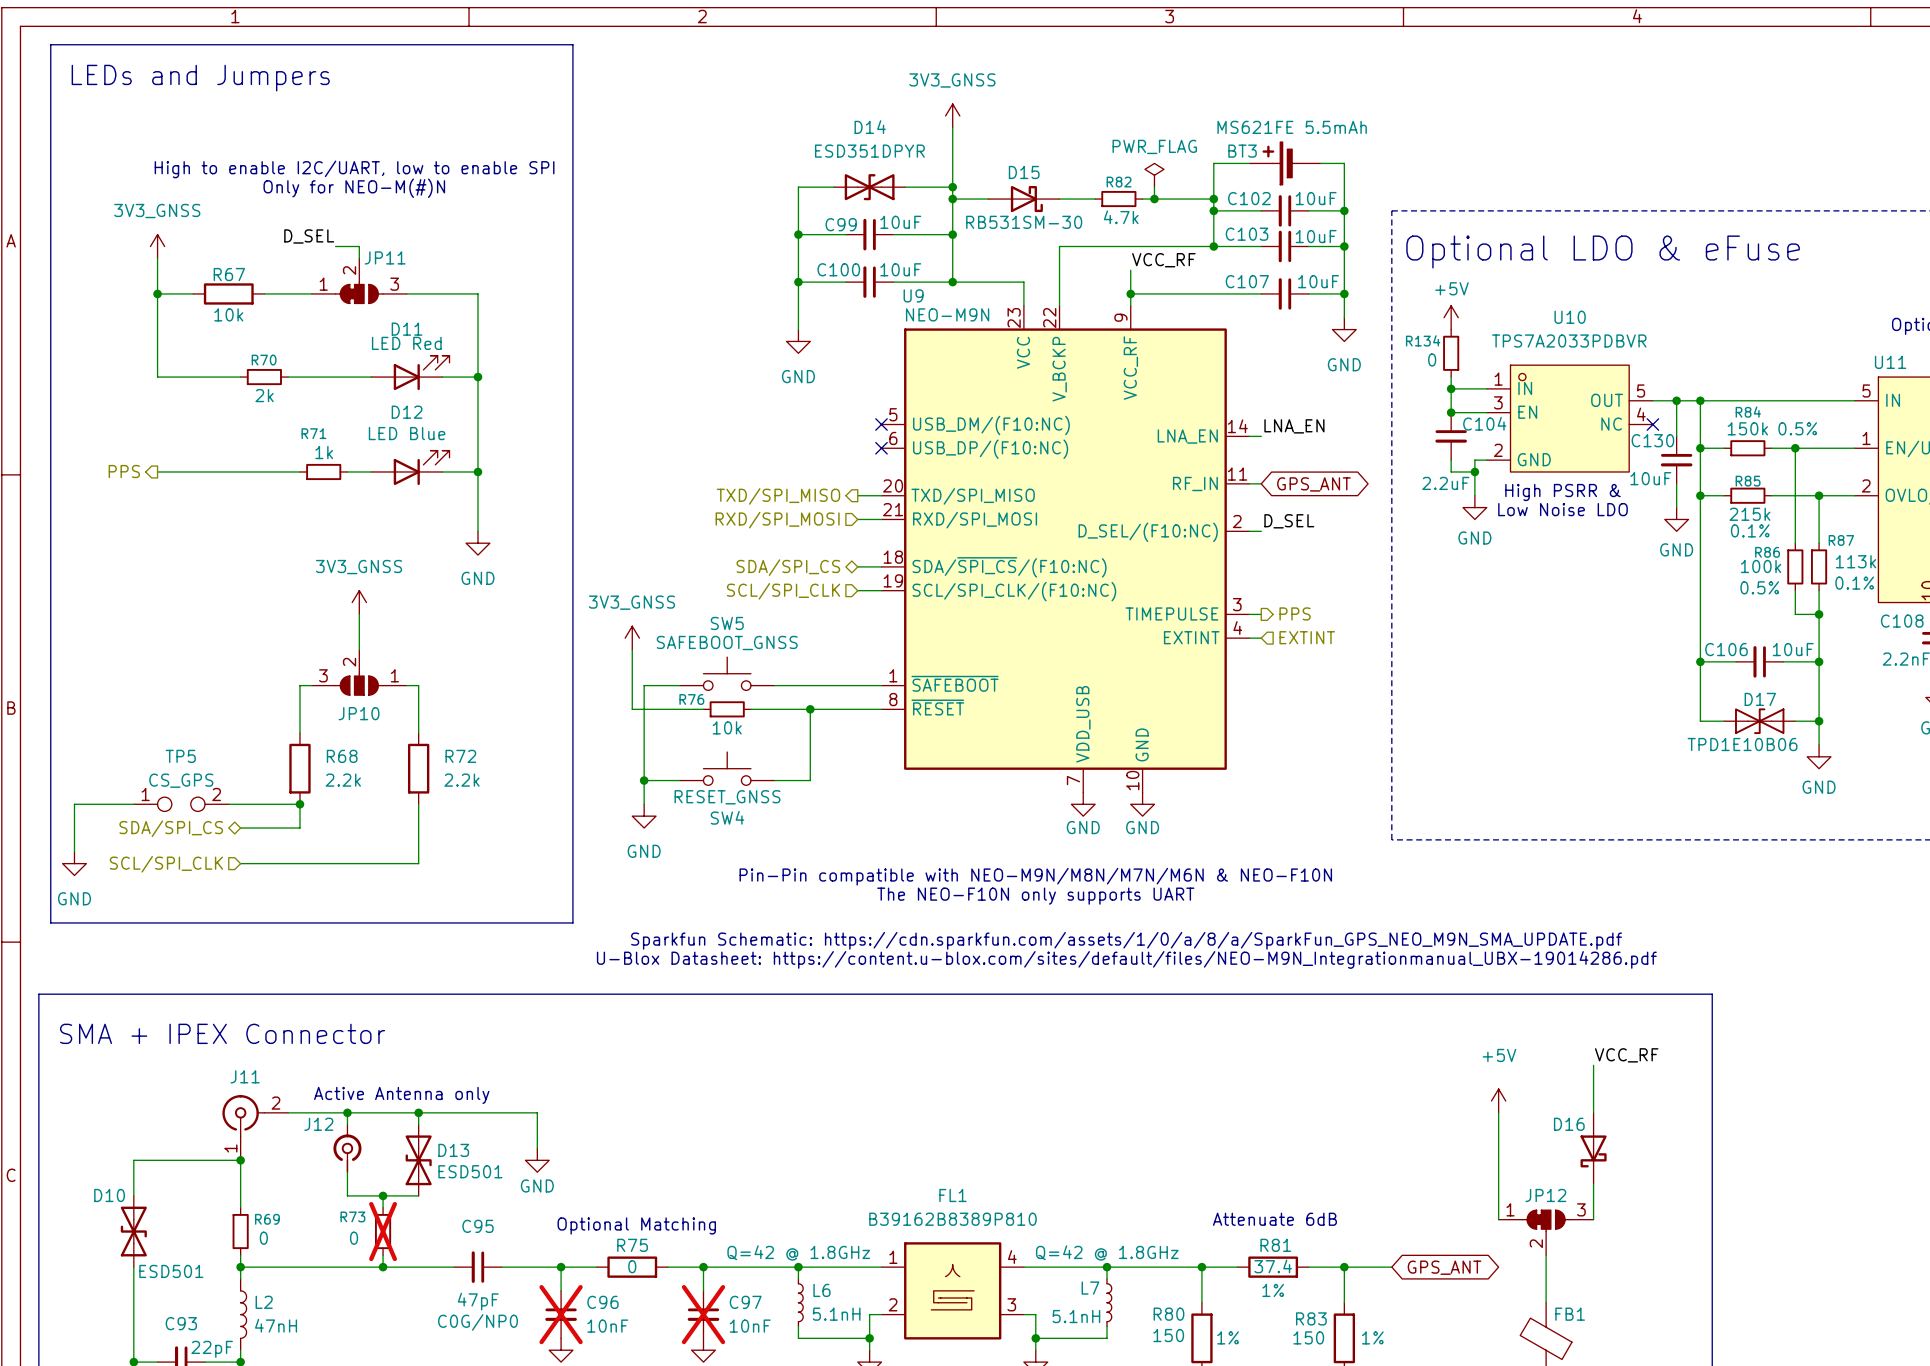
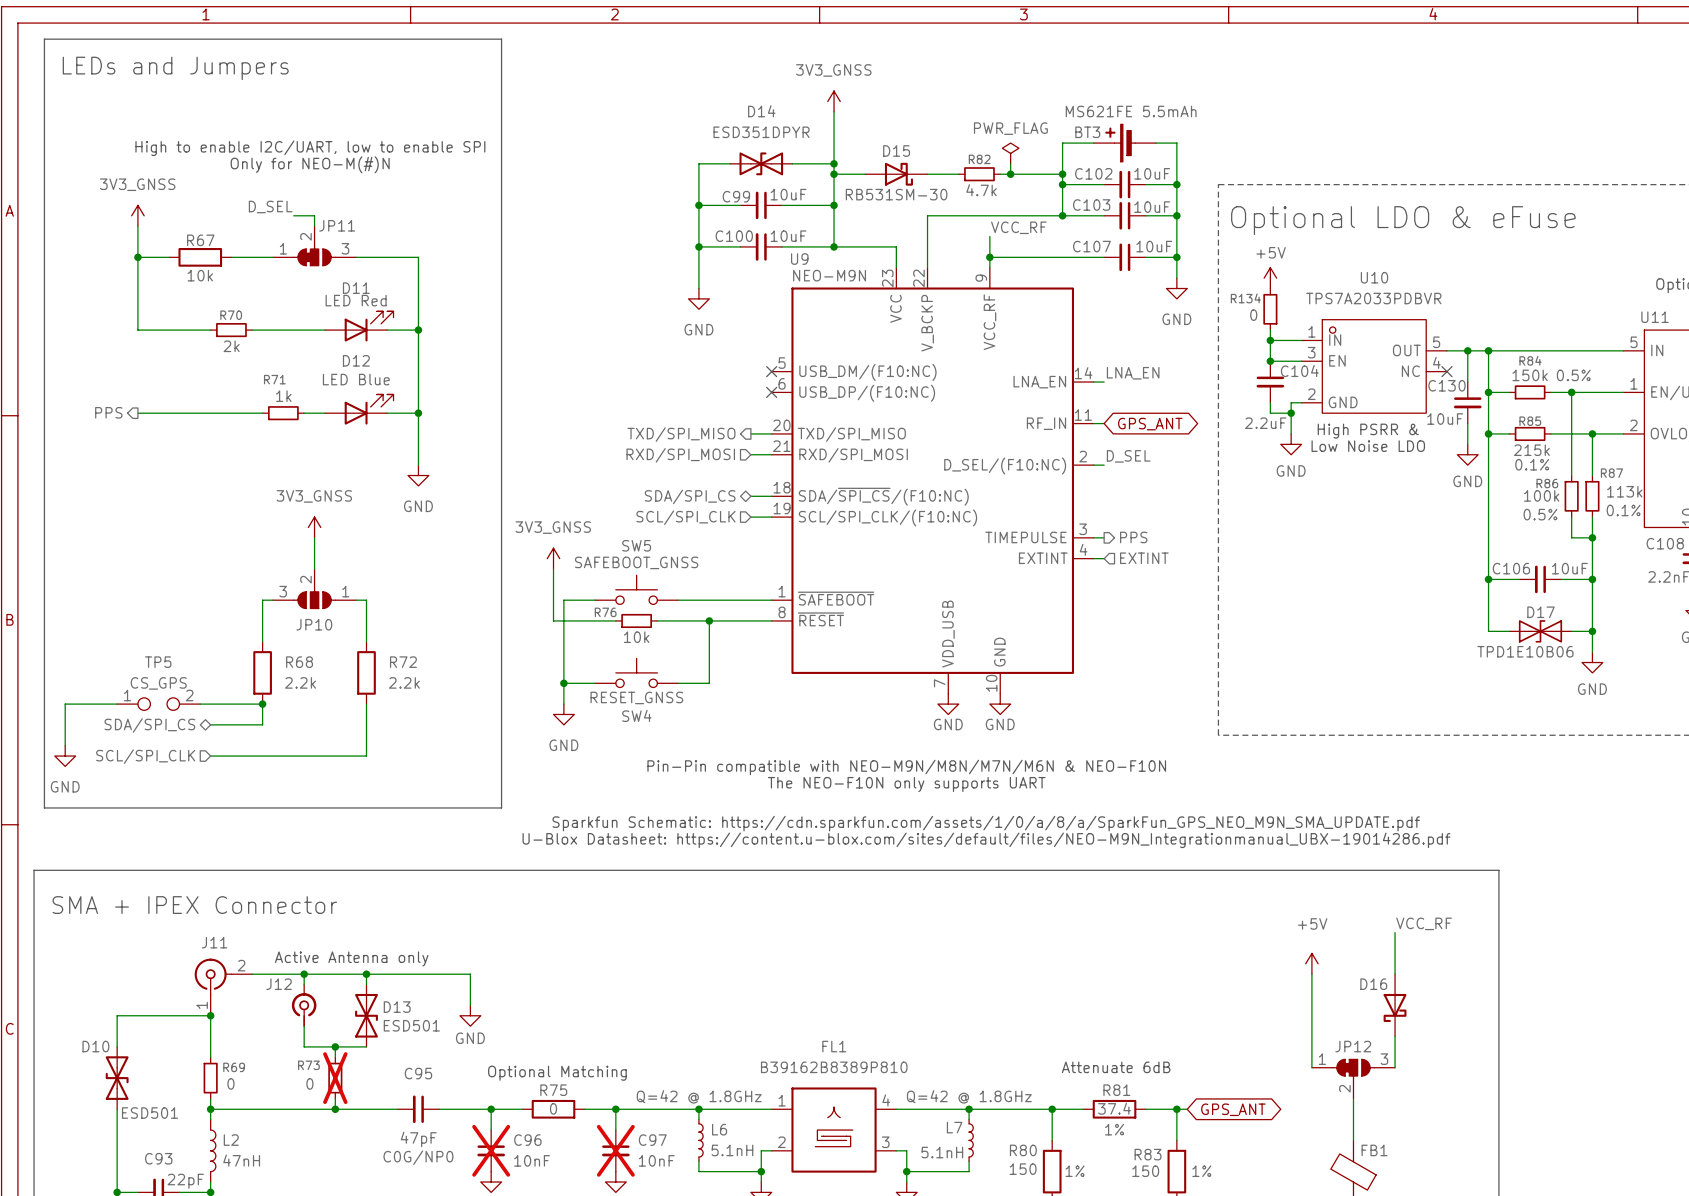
wire: (1356, 1267) (1391, 1267) -> none
global label position: GPS_ANT (1444, 1267) -> GPS_ANT (1233, 1109)

